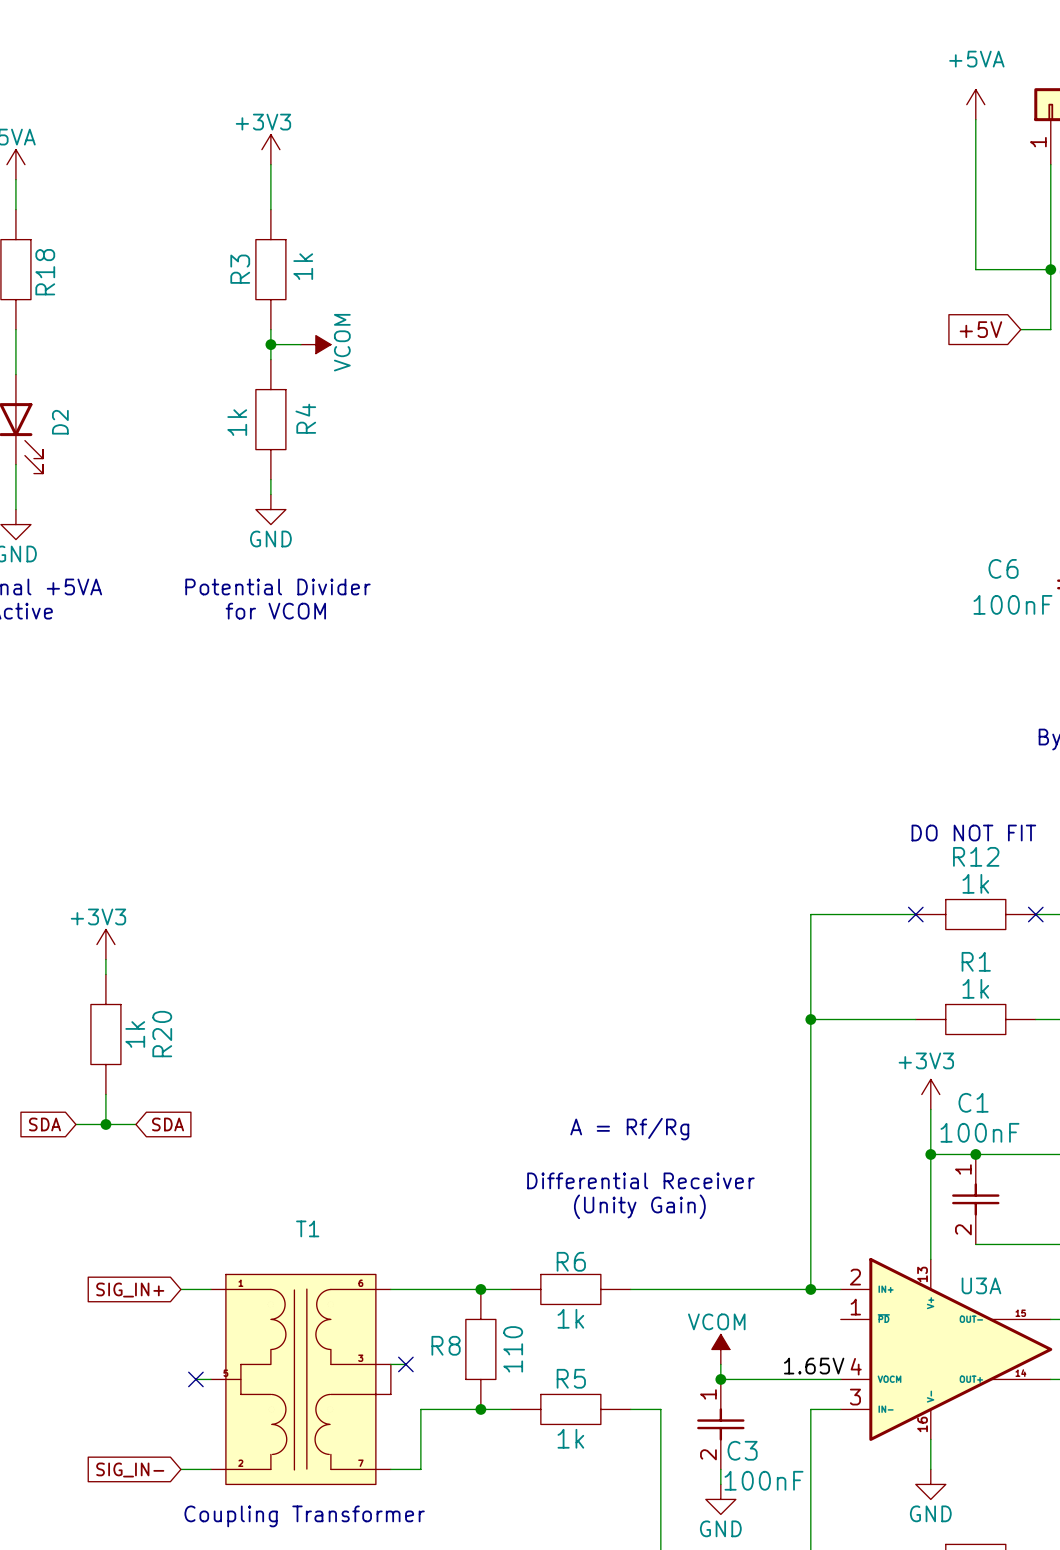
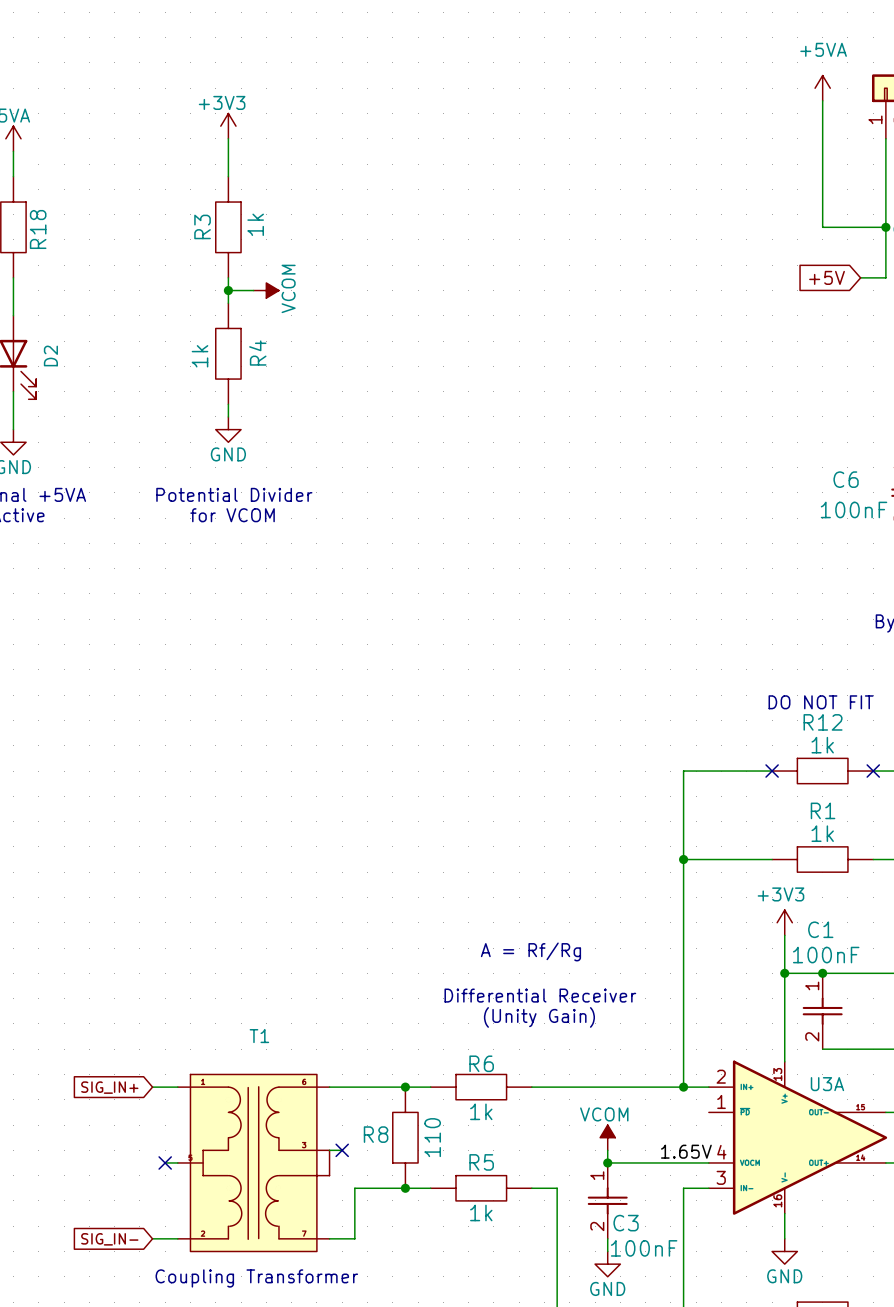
power symbol: +3V3 (105, 944) -> none
wire: (105, 959) (105, 974) -> none
R20: 1k (105, 1034) -> none
wire: (105, 1094) (105, 1124) -> none
global label: SDA (44, 1124) -> none
wire: (75, 1124) (135, 1124) -> none
junction: (105, 1124) -> none
global label: SDA (168, 1124) -> none

